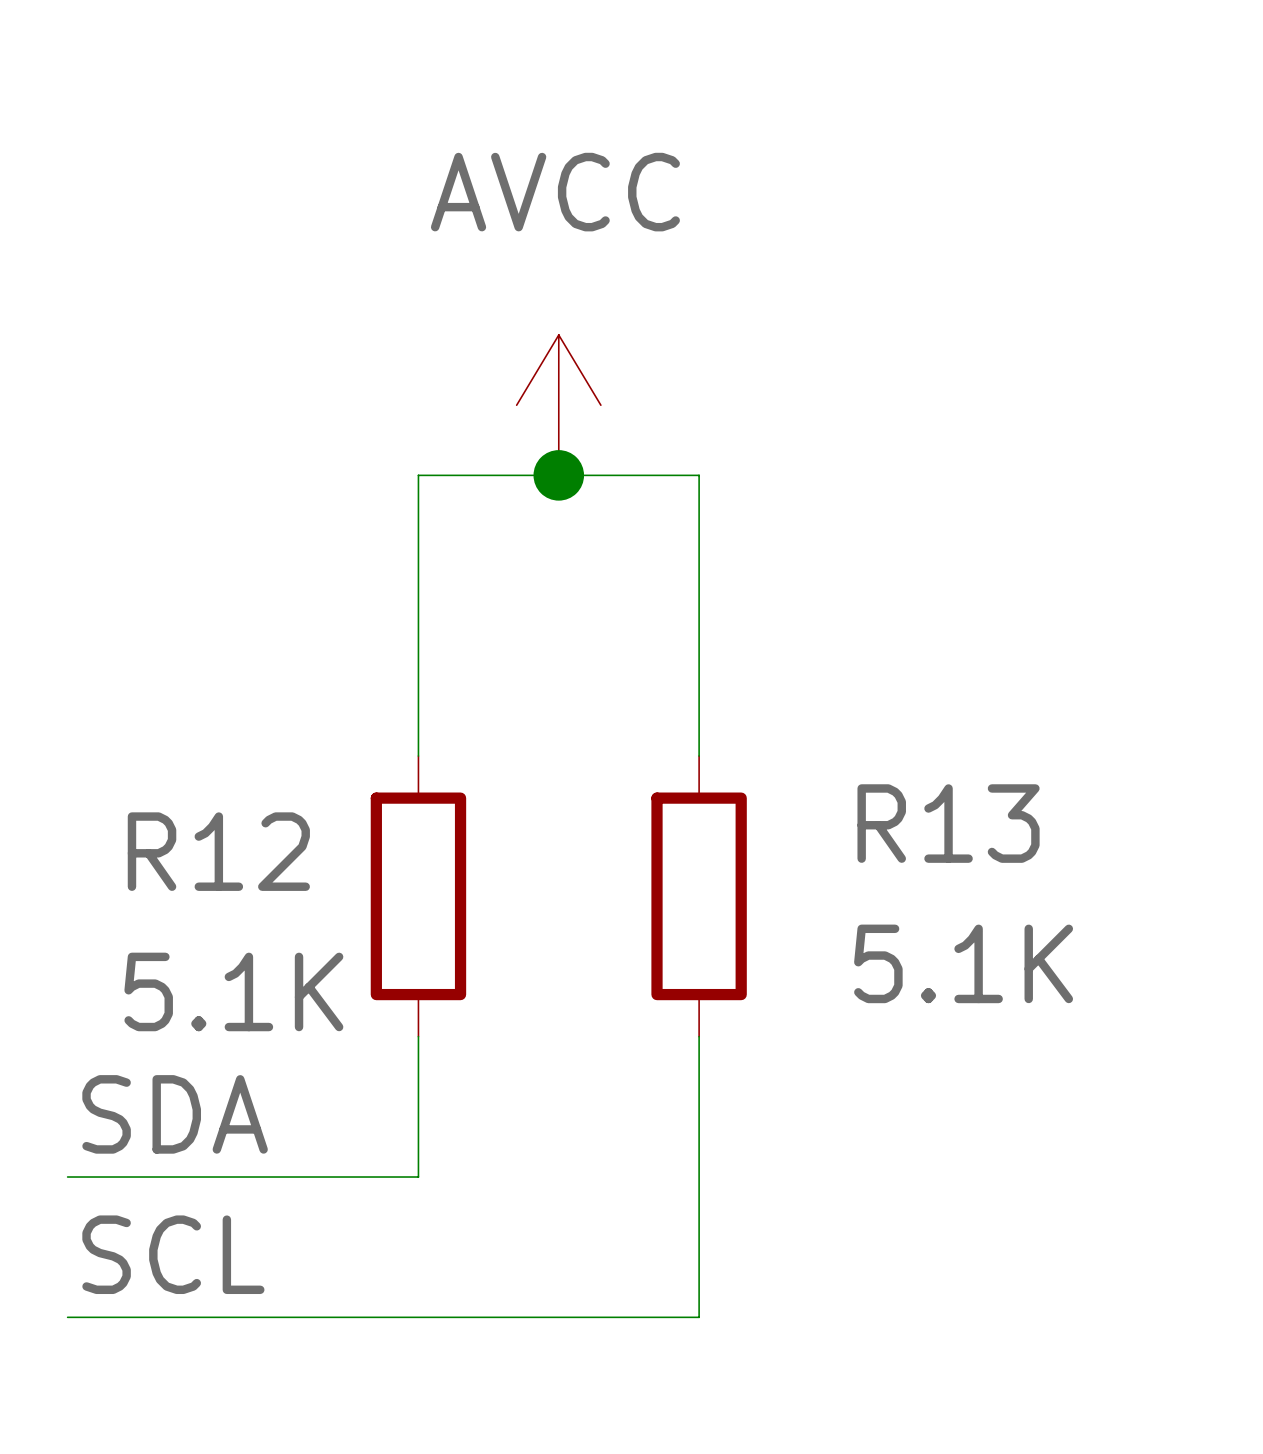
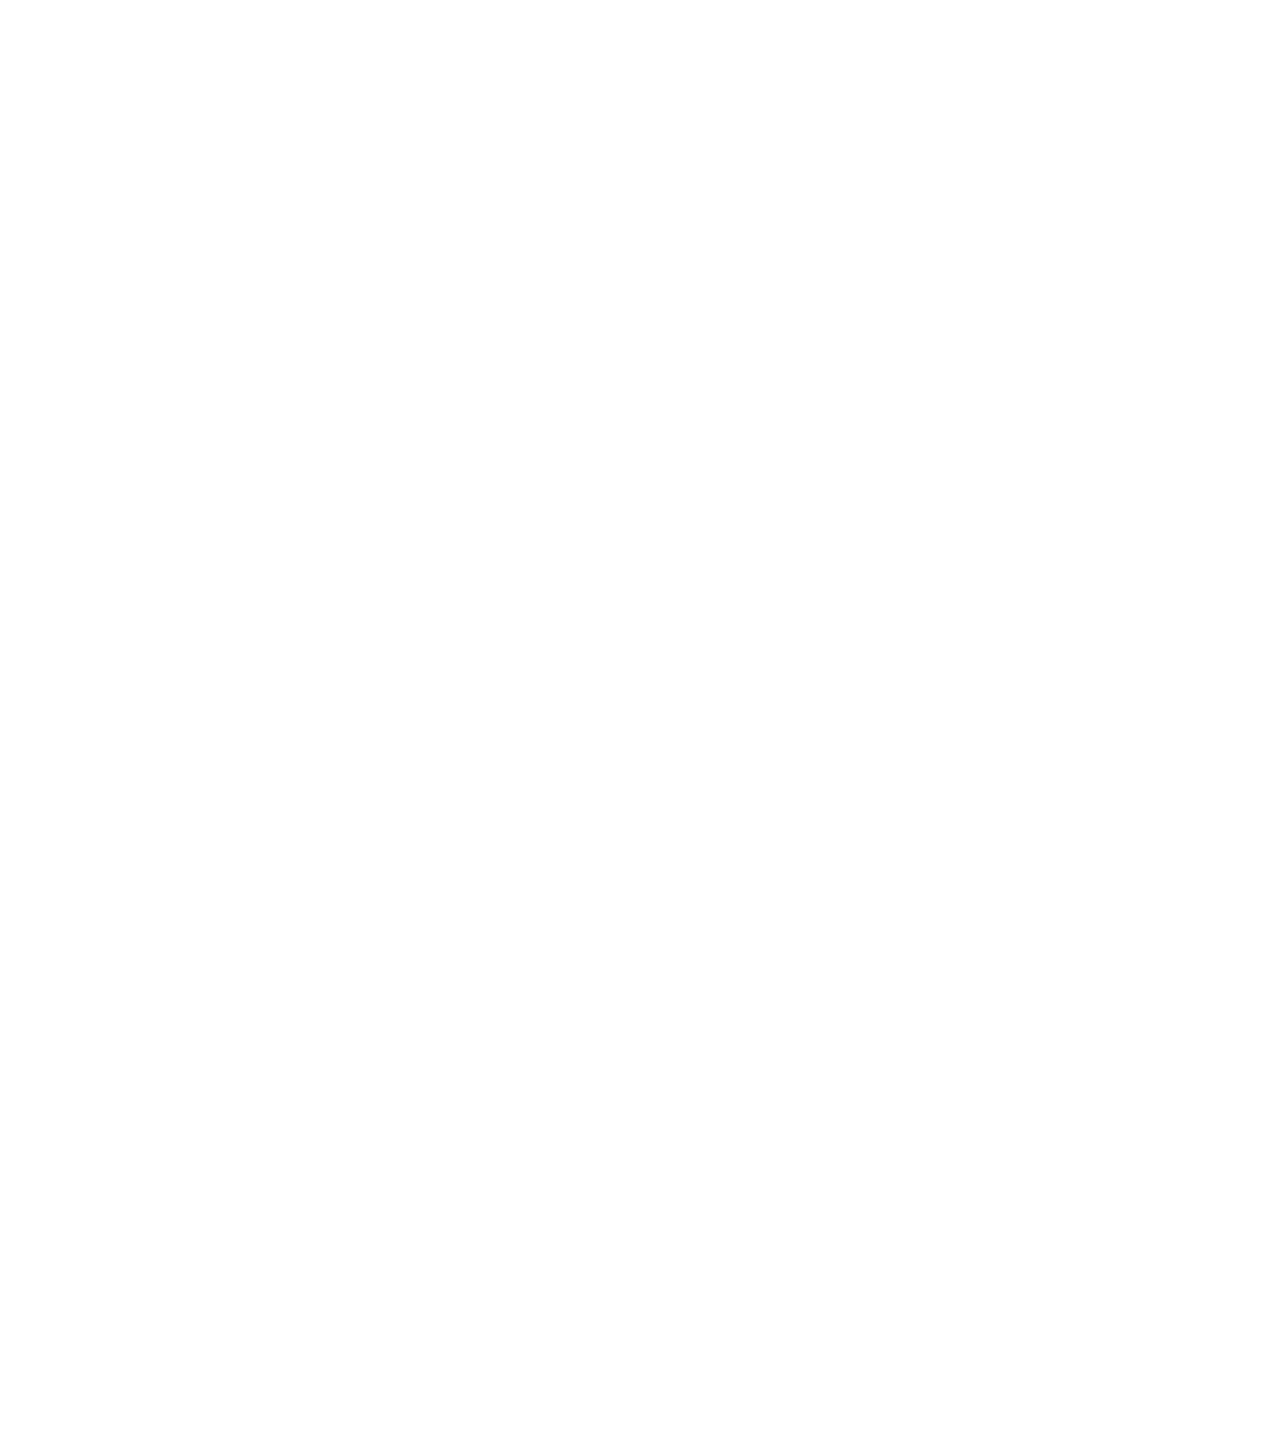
power symbol: AVCC (558, 405) -> none
junction: (558, 475) -> none
wire: (418, 756) (418, 475) (699, 475) (699, 756) -> none
R12: 5.1K (418, 896) -> none
R13: 5.1K (699, 896) -> none
wire: (418, 1036) (418, 1177) (67, 1177) -> none
wire: (699, 1036) (699, 1317) (67, 1317) -> none
label: SDA (175, 1114) -> none
label: SCL (173, 1254) -> none

